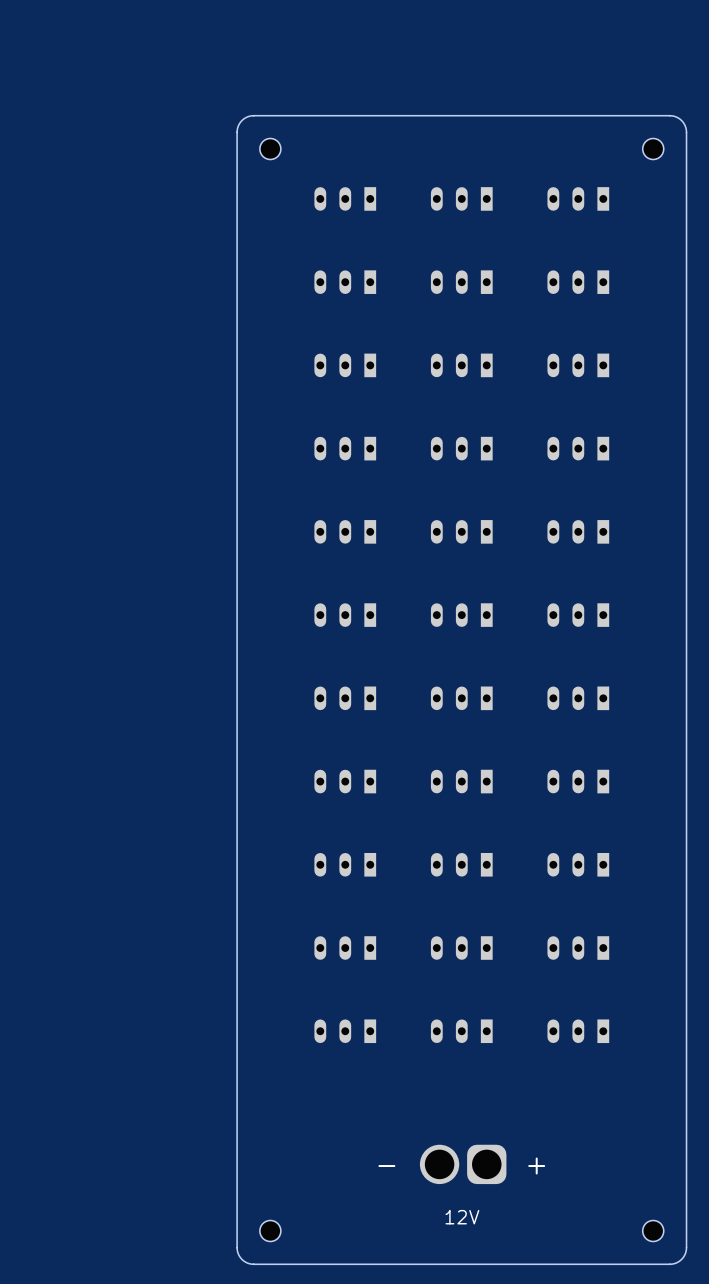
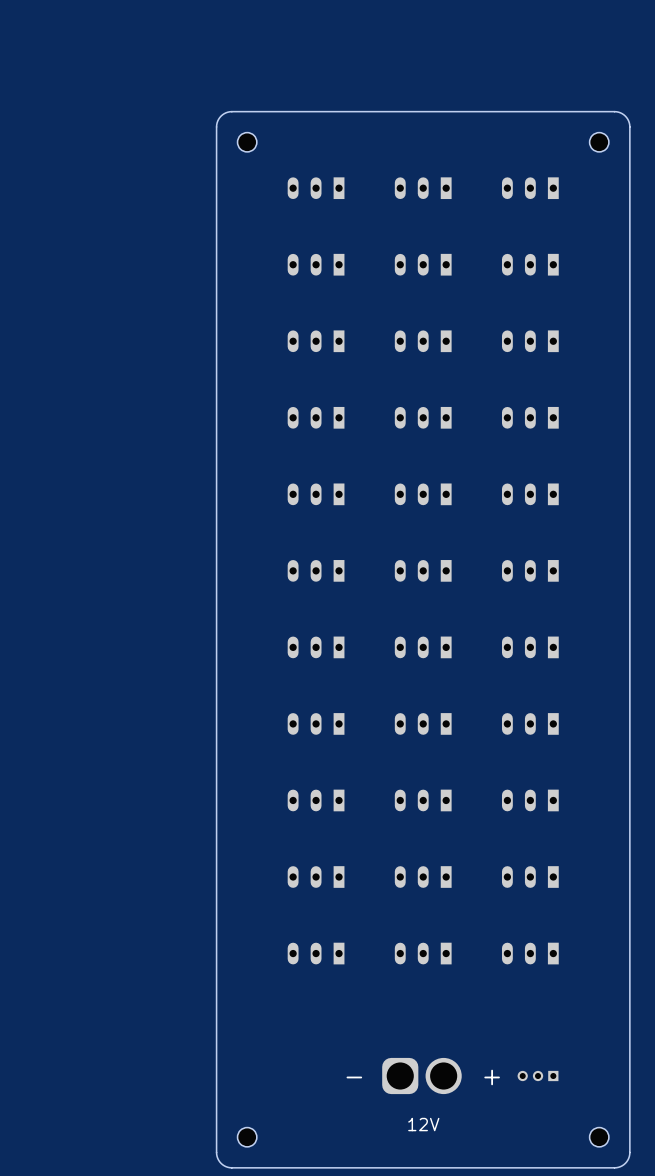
part rotation: 0° (463, 1164) -> 180° (421, 1076)
part: none -> (538, 1076)

